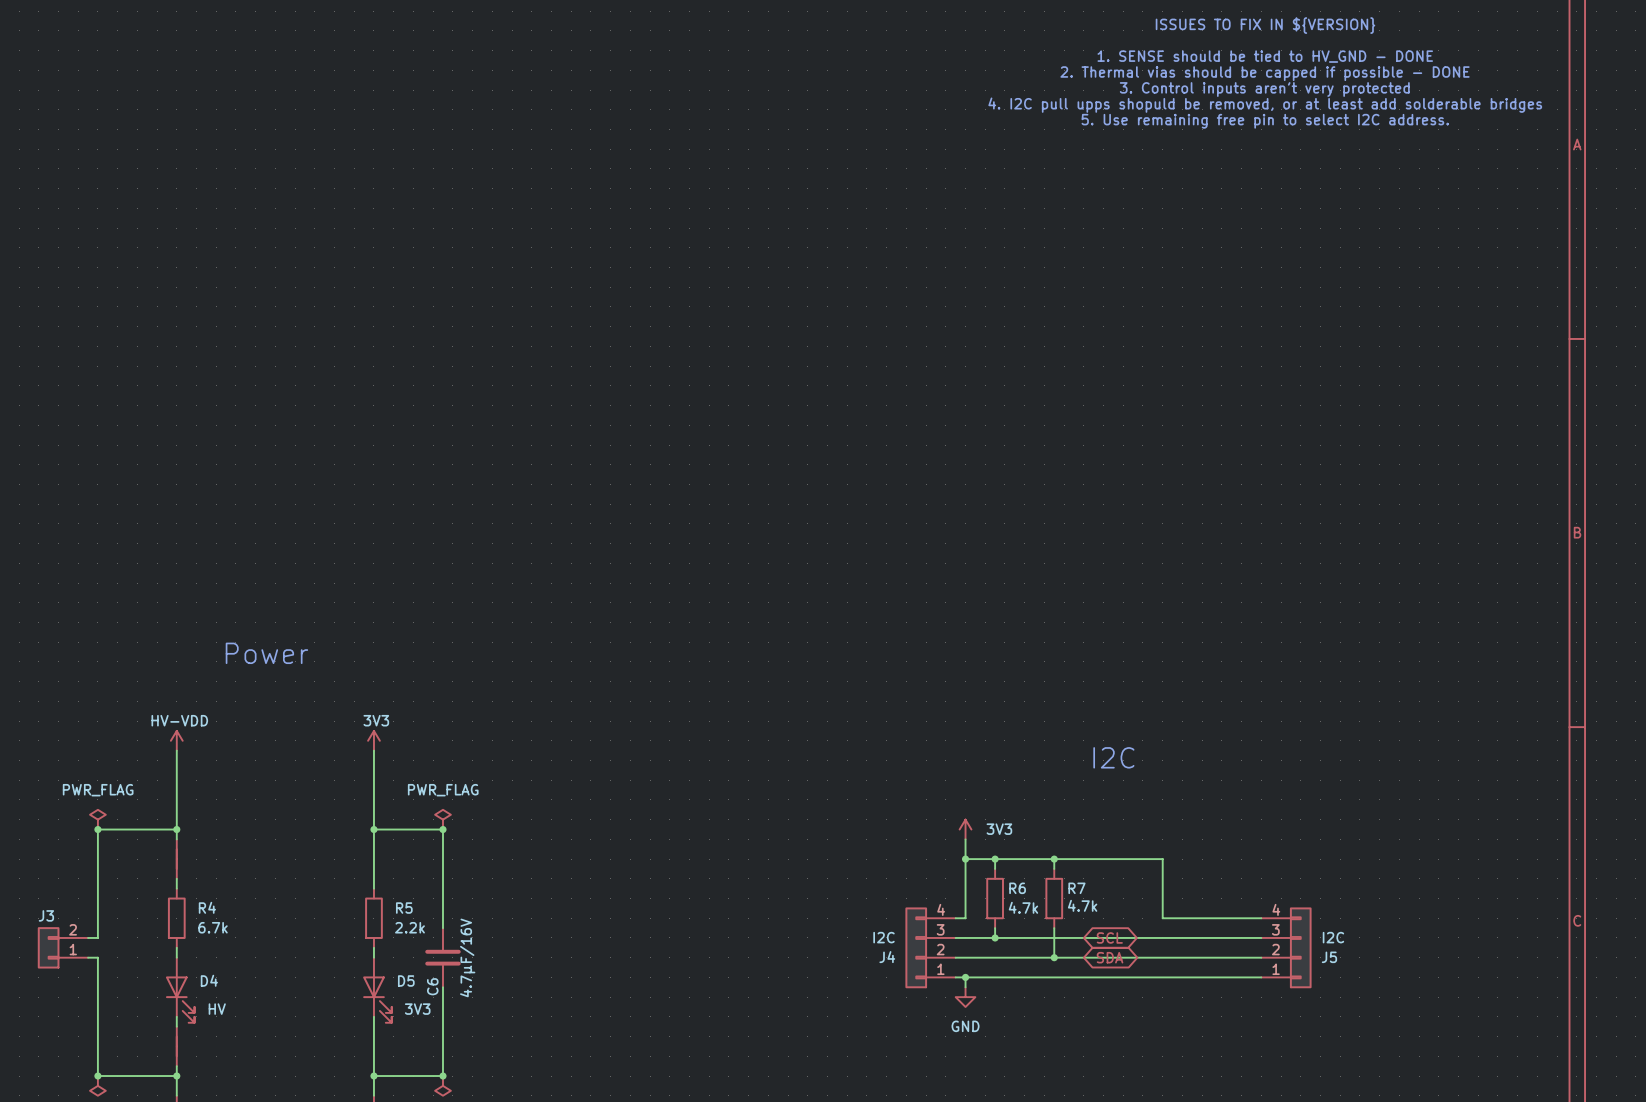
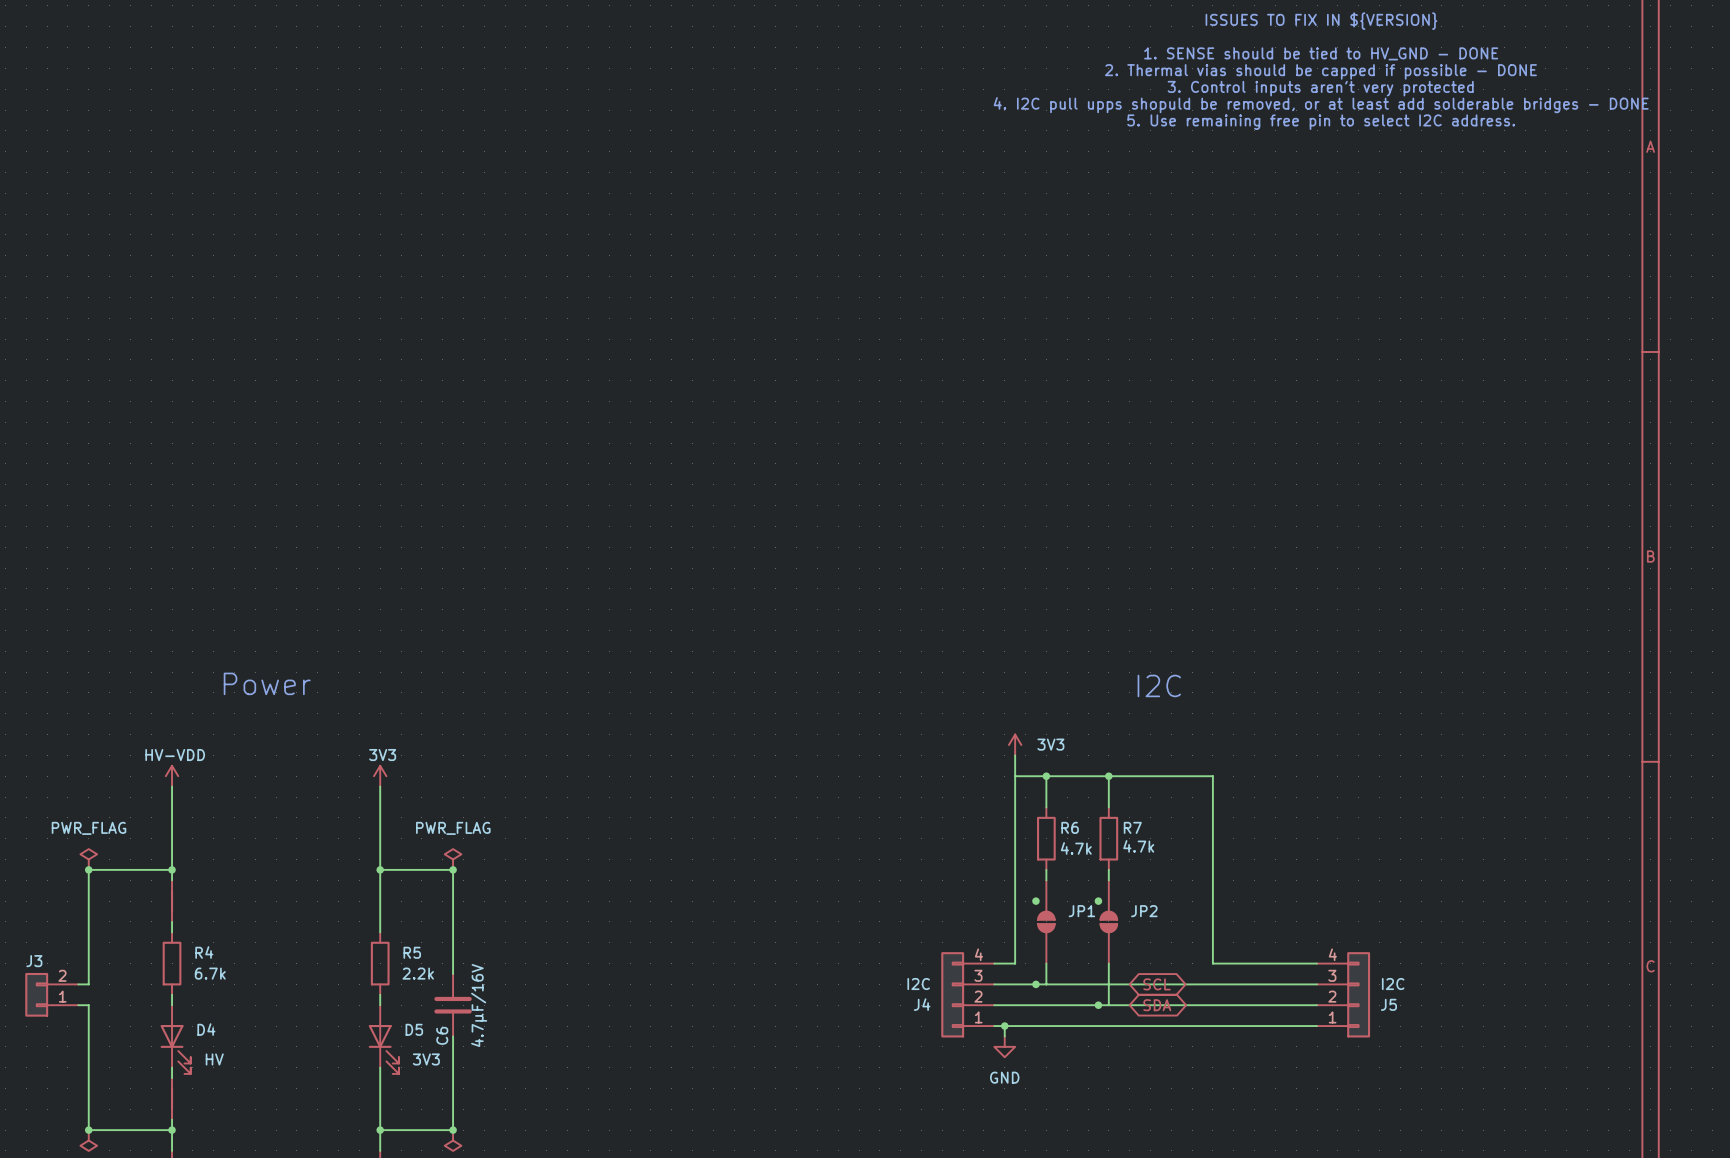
text: 4. I2C pull upps shopuld be removed, or at least add solderable bridges (1265, 105) -> 4. I2C pull upps shopuld be removed, or at least add solderable bridges - DONE (1321, 105)
wire: none -> (1046, 776) (1046, 807)
junction: none -> (1046, 776)
junction: none -> (1108, 776)
text position: I2C (1113, 757) -> I2C (1159, 685)
power symbol position: 3V3 (965, 829) -> 3V3 (1015, 745)
wire: (965, 839) (965, 918) -> (1015, 755) (1015, 963) (1004, 963)
wire: (965, 859) (1162, 859) -> (1015, 776) (1212, 776) (1212, 901)
junction: (965, 859) -> none
wire: (995, 859) (995, 868) -> (1046, 869) (1046, 880)
wire: (1054, 859) (1054, 868) -> (1108, 869) (1108, 880)
JP1: none -> (1046, 921)
JP2: none -> (1108, 921)
R6 position: (995, 898) -> (1046, 838)
R7 position: (1054, 898) -> (1108, 838)
wire: none -> (1046, 963) (1046, 984)
wire: none -> (1108, 963) (1108, 1005)
wire: (995, 928) (995, 937) -> none
wire: (1054, 928) (1054, 957) -> (1108, 776) (1108, 807)

